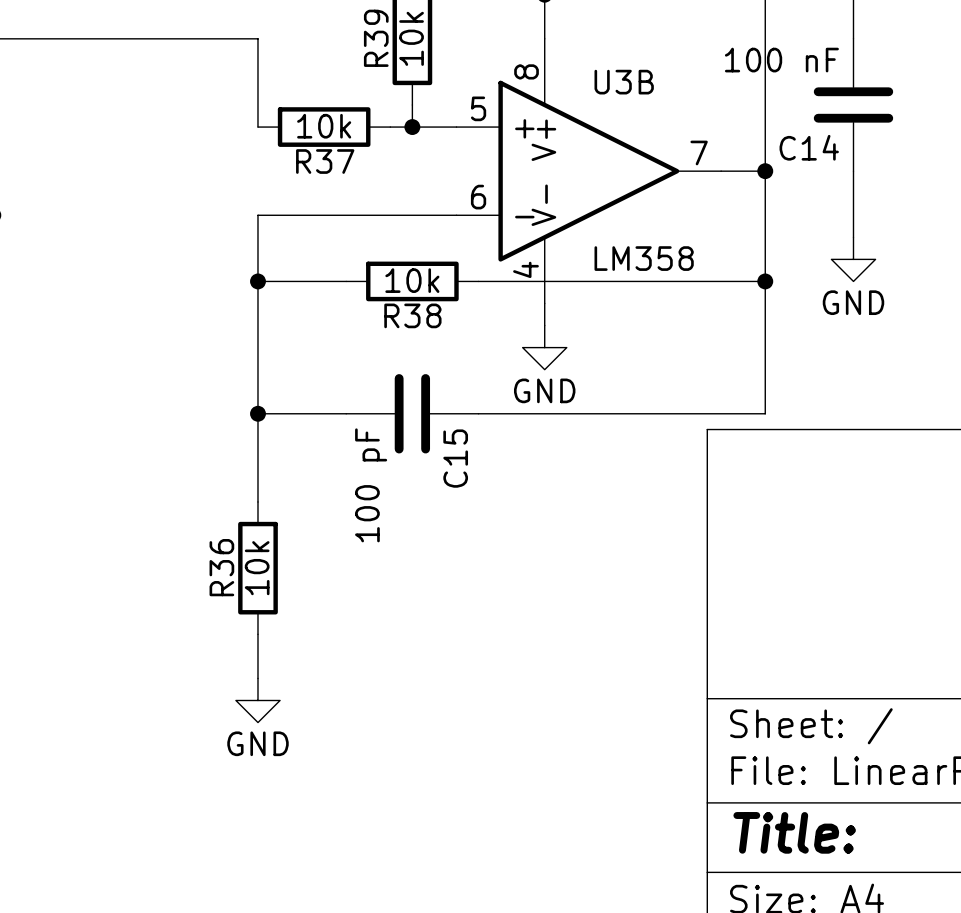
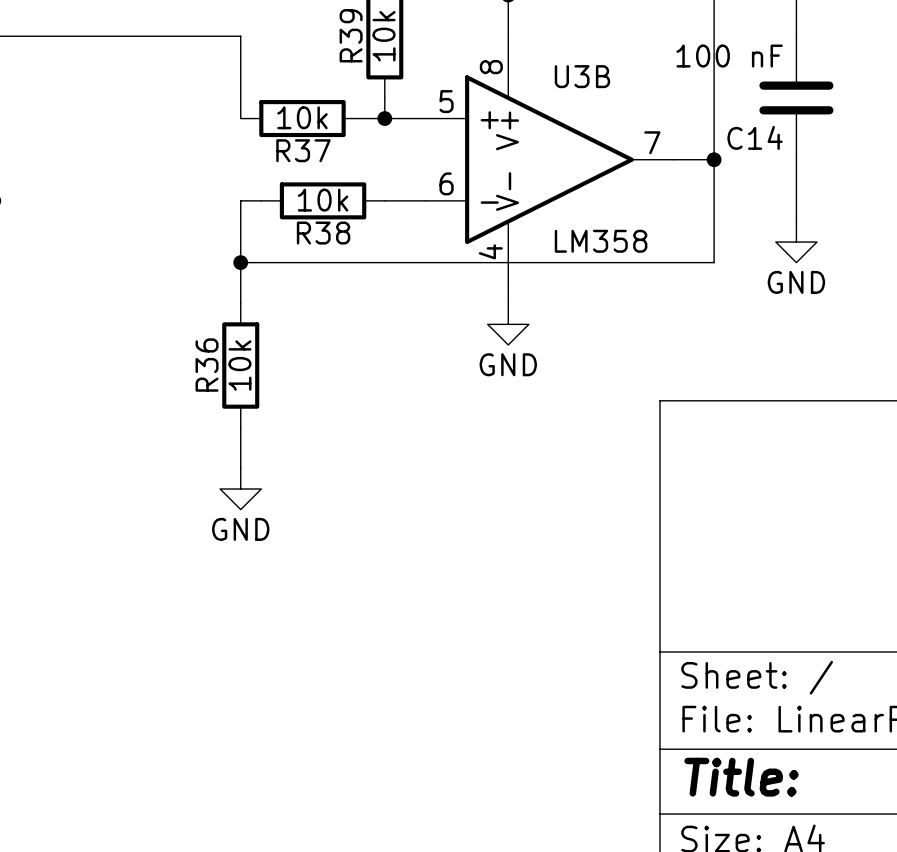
wire: (280, 215) (412, 215) -> (323, 262) (446, 262)
R38 position: (412, 281) -> (323, 200)
wire: (765, 281) (765, 413) (478, 413) -> none
junction: (765, 281) -> none
wire: (257, 325) (257, 457) -> none
wire: (257, 413) (346, 413) -> none
junction: (257, 413) -> none
C15: 100 pF (412, 413) -> none
R36 position: (257, 568) -> (240, 365)
wire: (257, 634) (257, 678) -> none
power symbol position: GND (257, 700) -> GND (240, 489)

